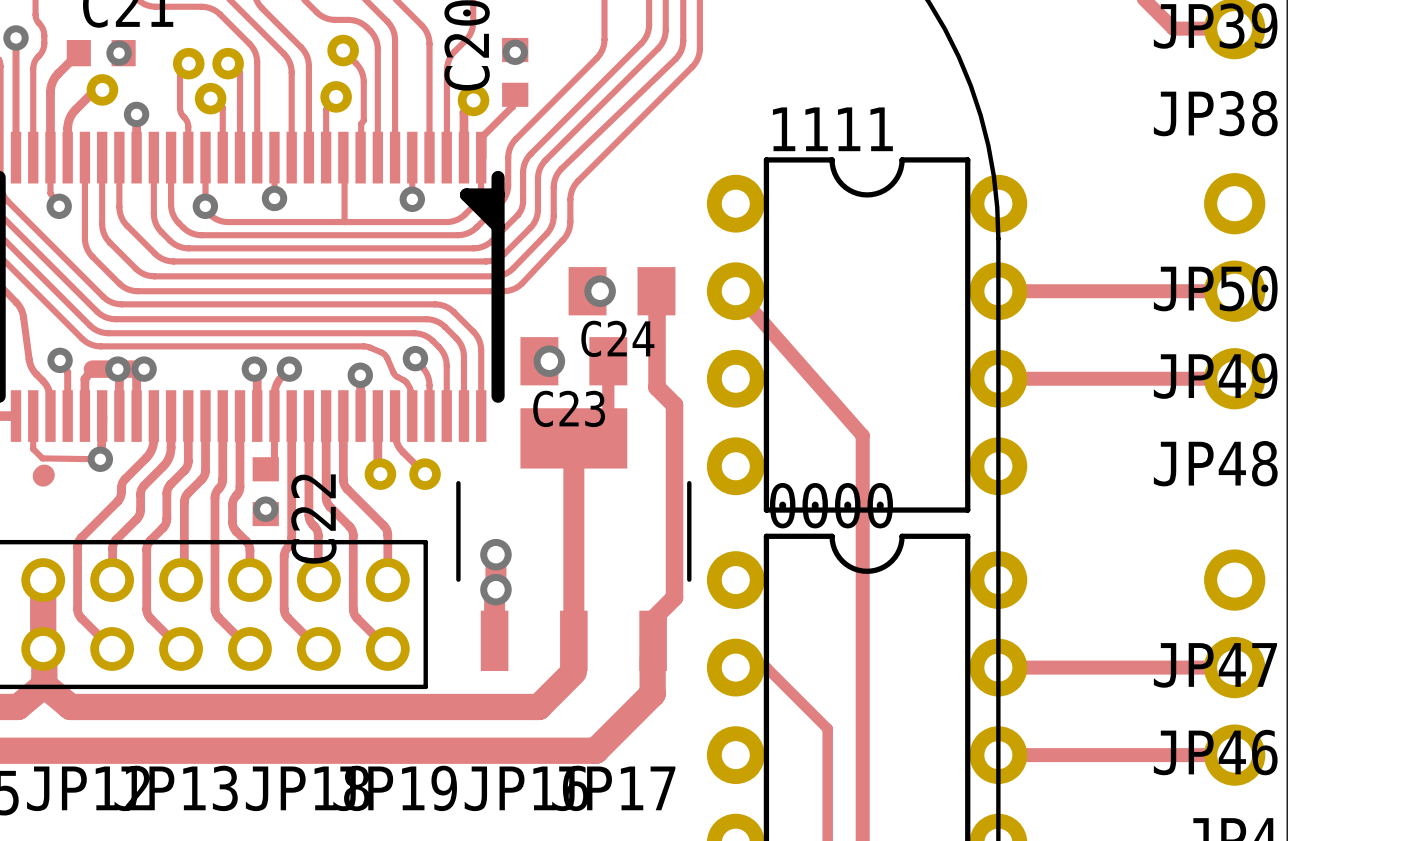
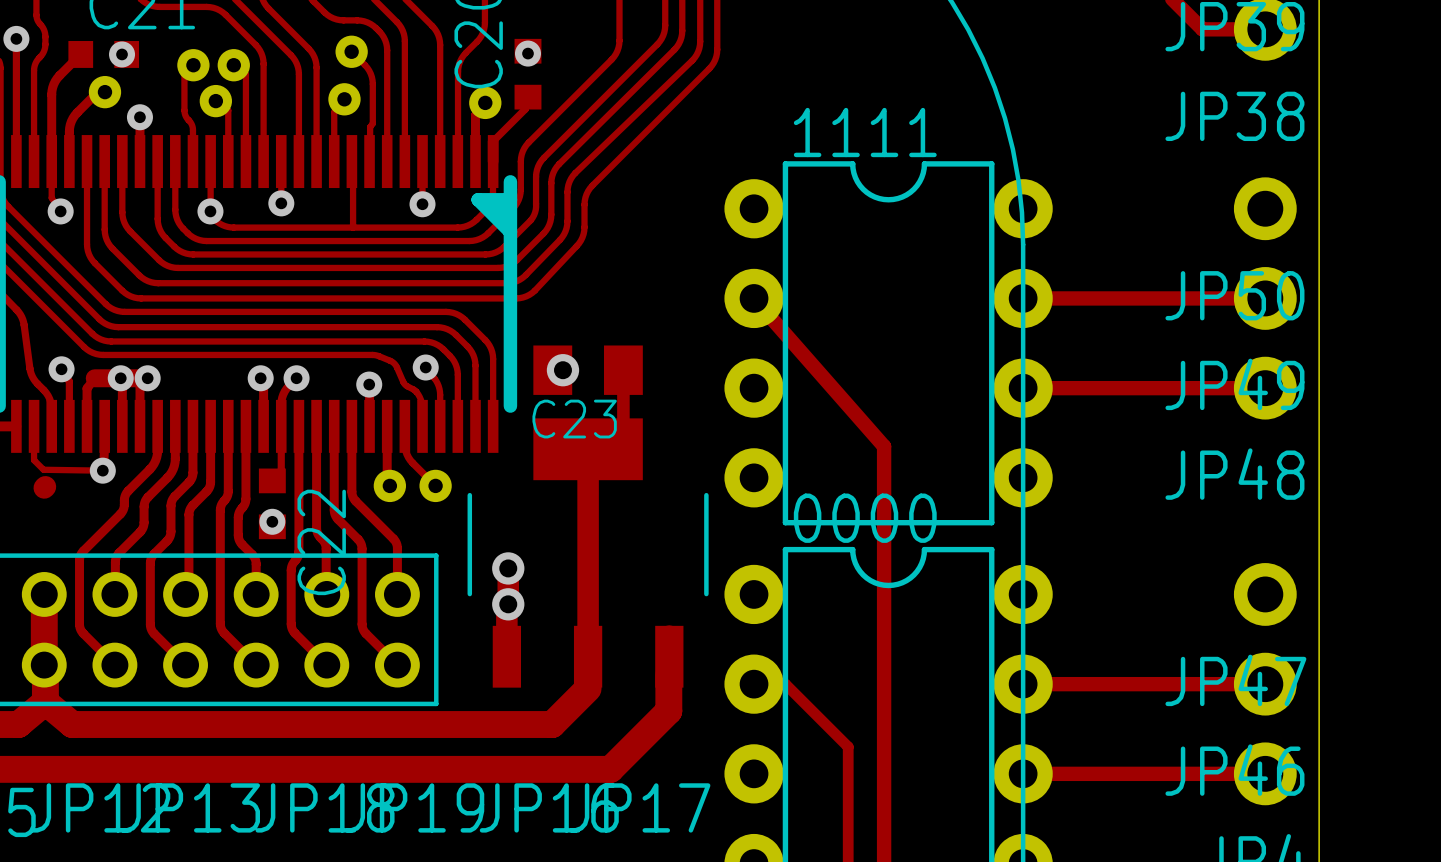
via: (600, 291) -> none
C24: (622, 291) -> none
track: (656, 291) (657, 387) (674, 405) (674, 597) (653, 618) -> none

